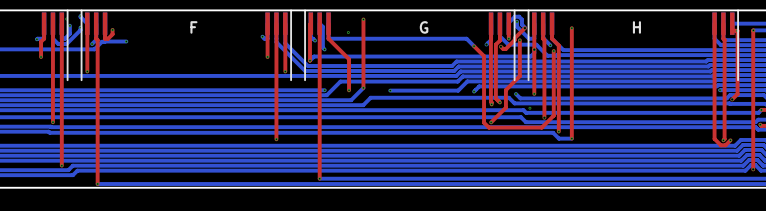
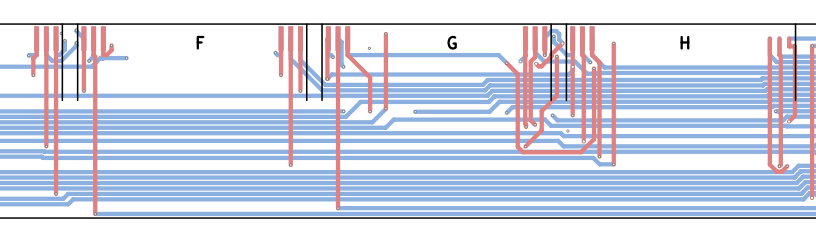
part: (723, 23) -> none

